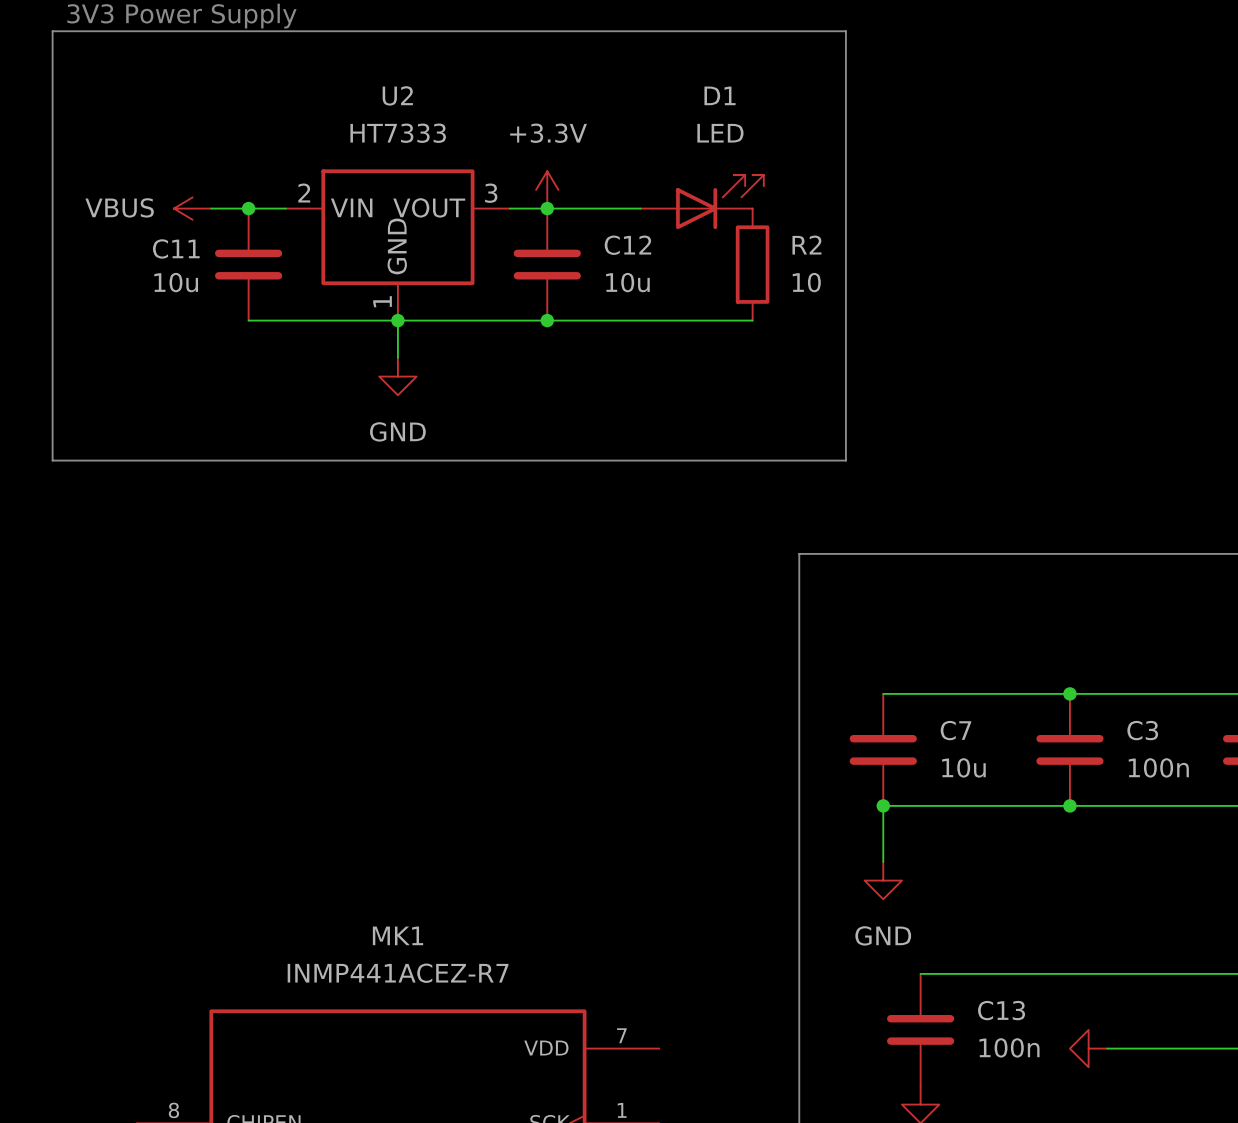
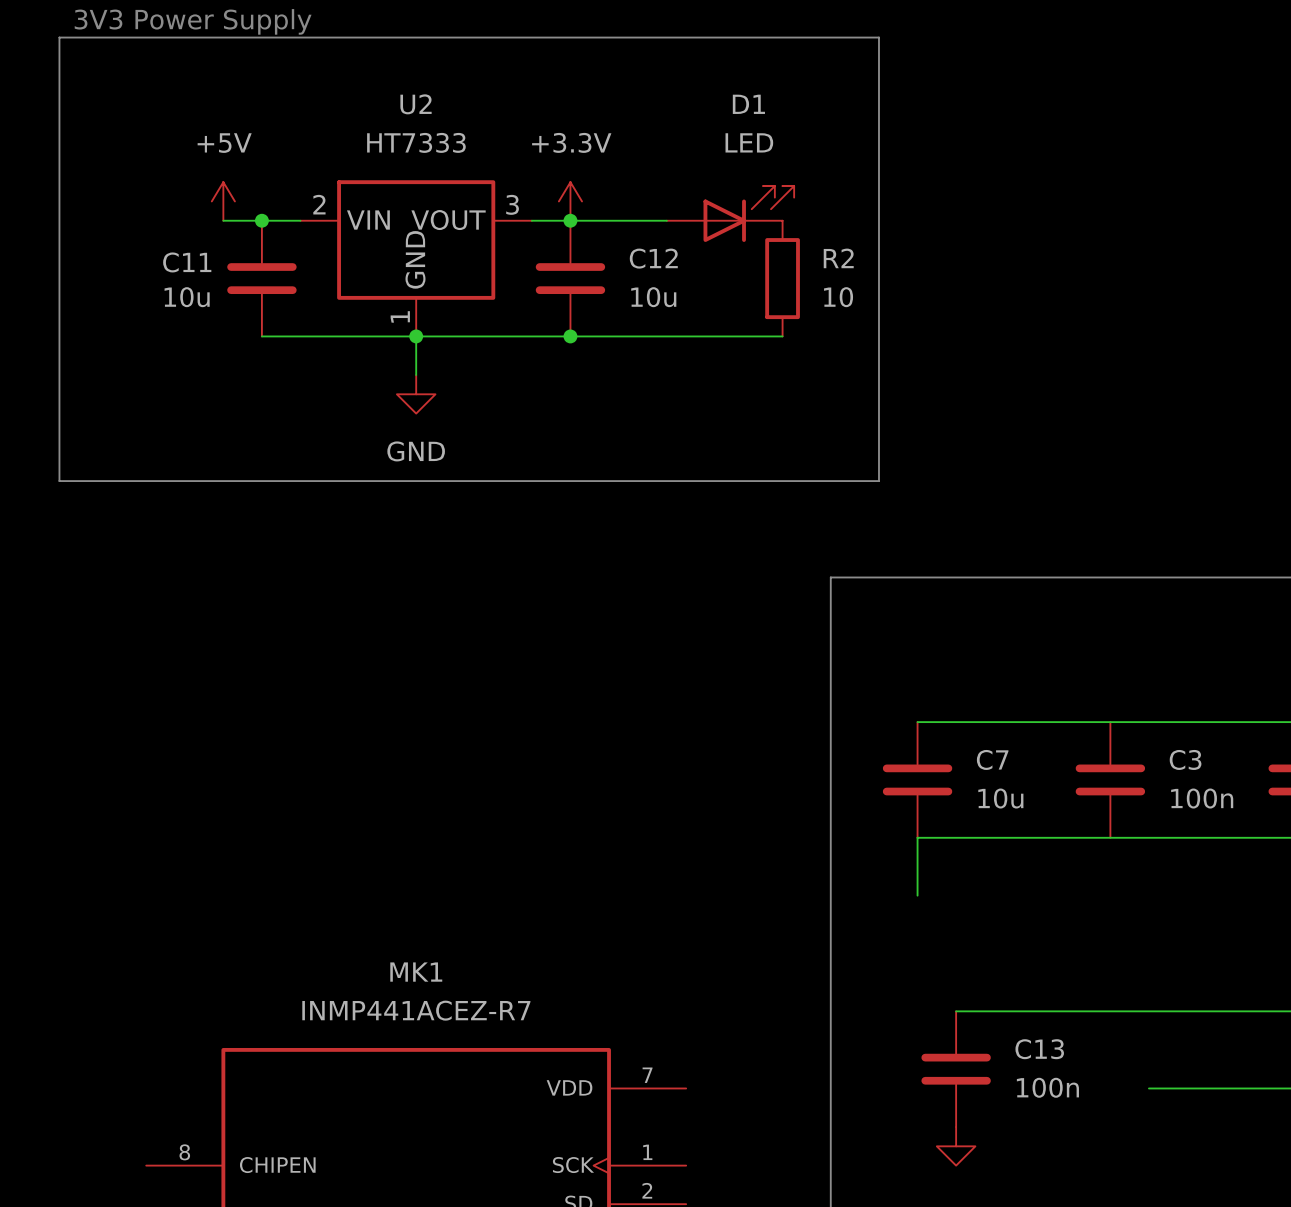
power symbol: none -> +5V (223, 201)
power symbol: VBUS (192, 208) -> none
junction: (1069, 693) -> none
junction: (883, 805) -> none
junction: (1069, 805) -> none
power symbol: GND (883, 880) -> none
power symbol: (1088, 1048) -> none

